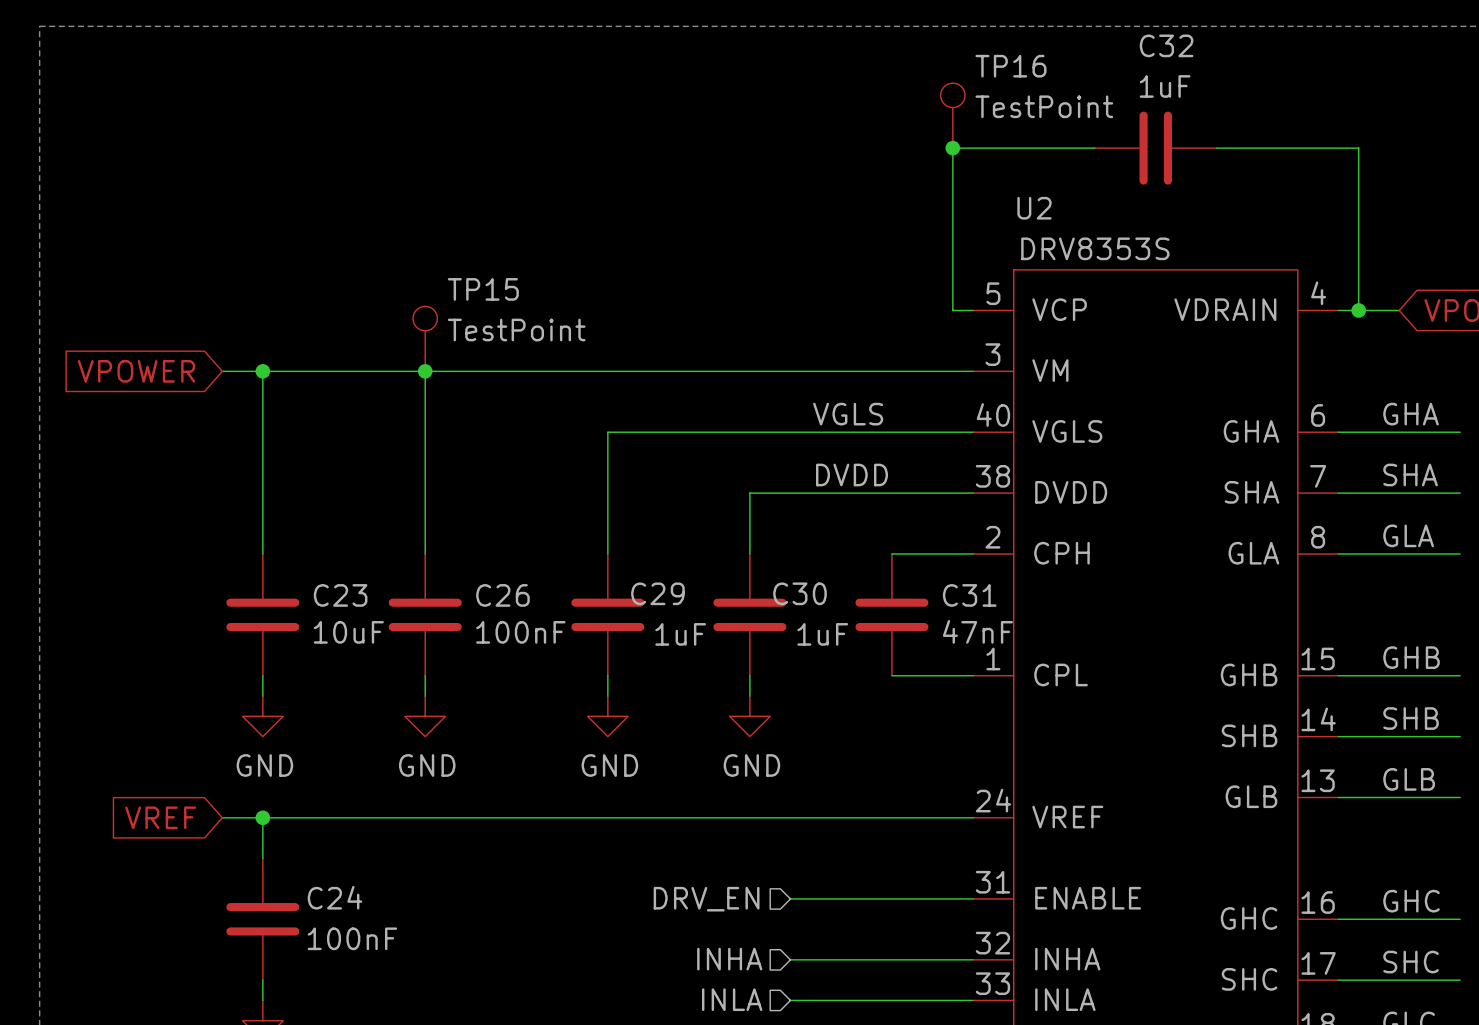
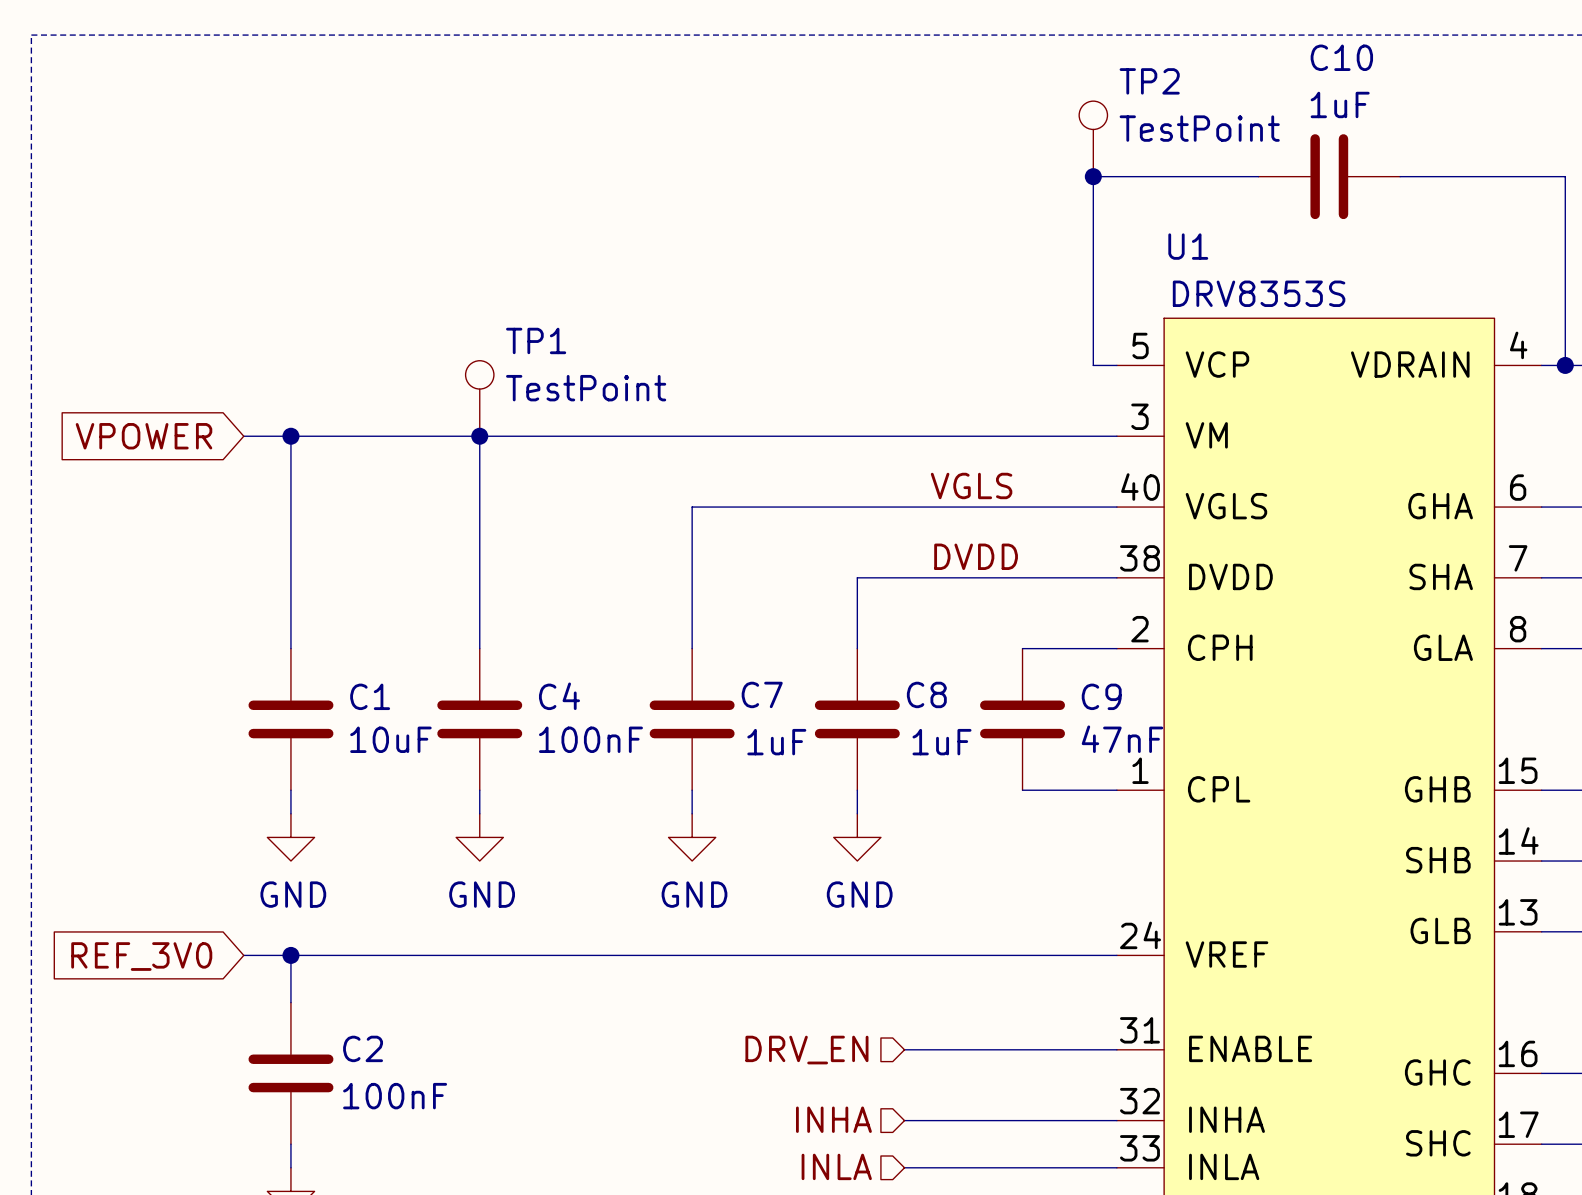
C32 name: C32 (1166, 45) -> C10 (1341, 57)
TP16 name: TP16 (1010, 66) -> TP2 (1149, 81)
U2 name: U2 (1034, 208) -> U1 (1188, 246)
TP15 name: TP15 (483, 289) -> TP1 (536, 340)
C29 name: C29 (657, 593) -> C7 (762, 694)
C30 name: C30 (800, 593) -> C8 (926, 694)
C23 name: C23 (340, 595) -> C1 (370, 696)
C26 name: C26 (502, 595) -> C4 (559, 696)
C31 name: C31 (969, 595) -> C9 (1101, 696)
global label: VREF (160, 817) -> REF_3V0 (141, 956)
C24 name: C24 (335, 897) -> C2 (363, 1048)

